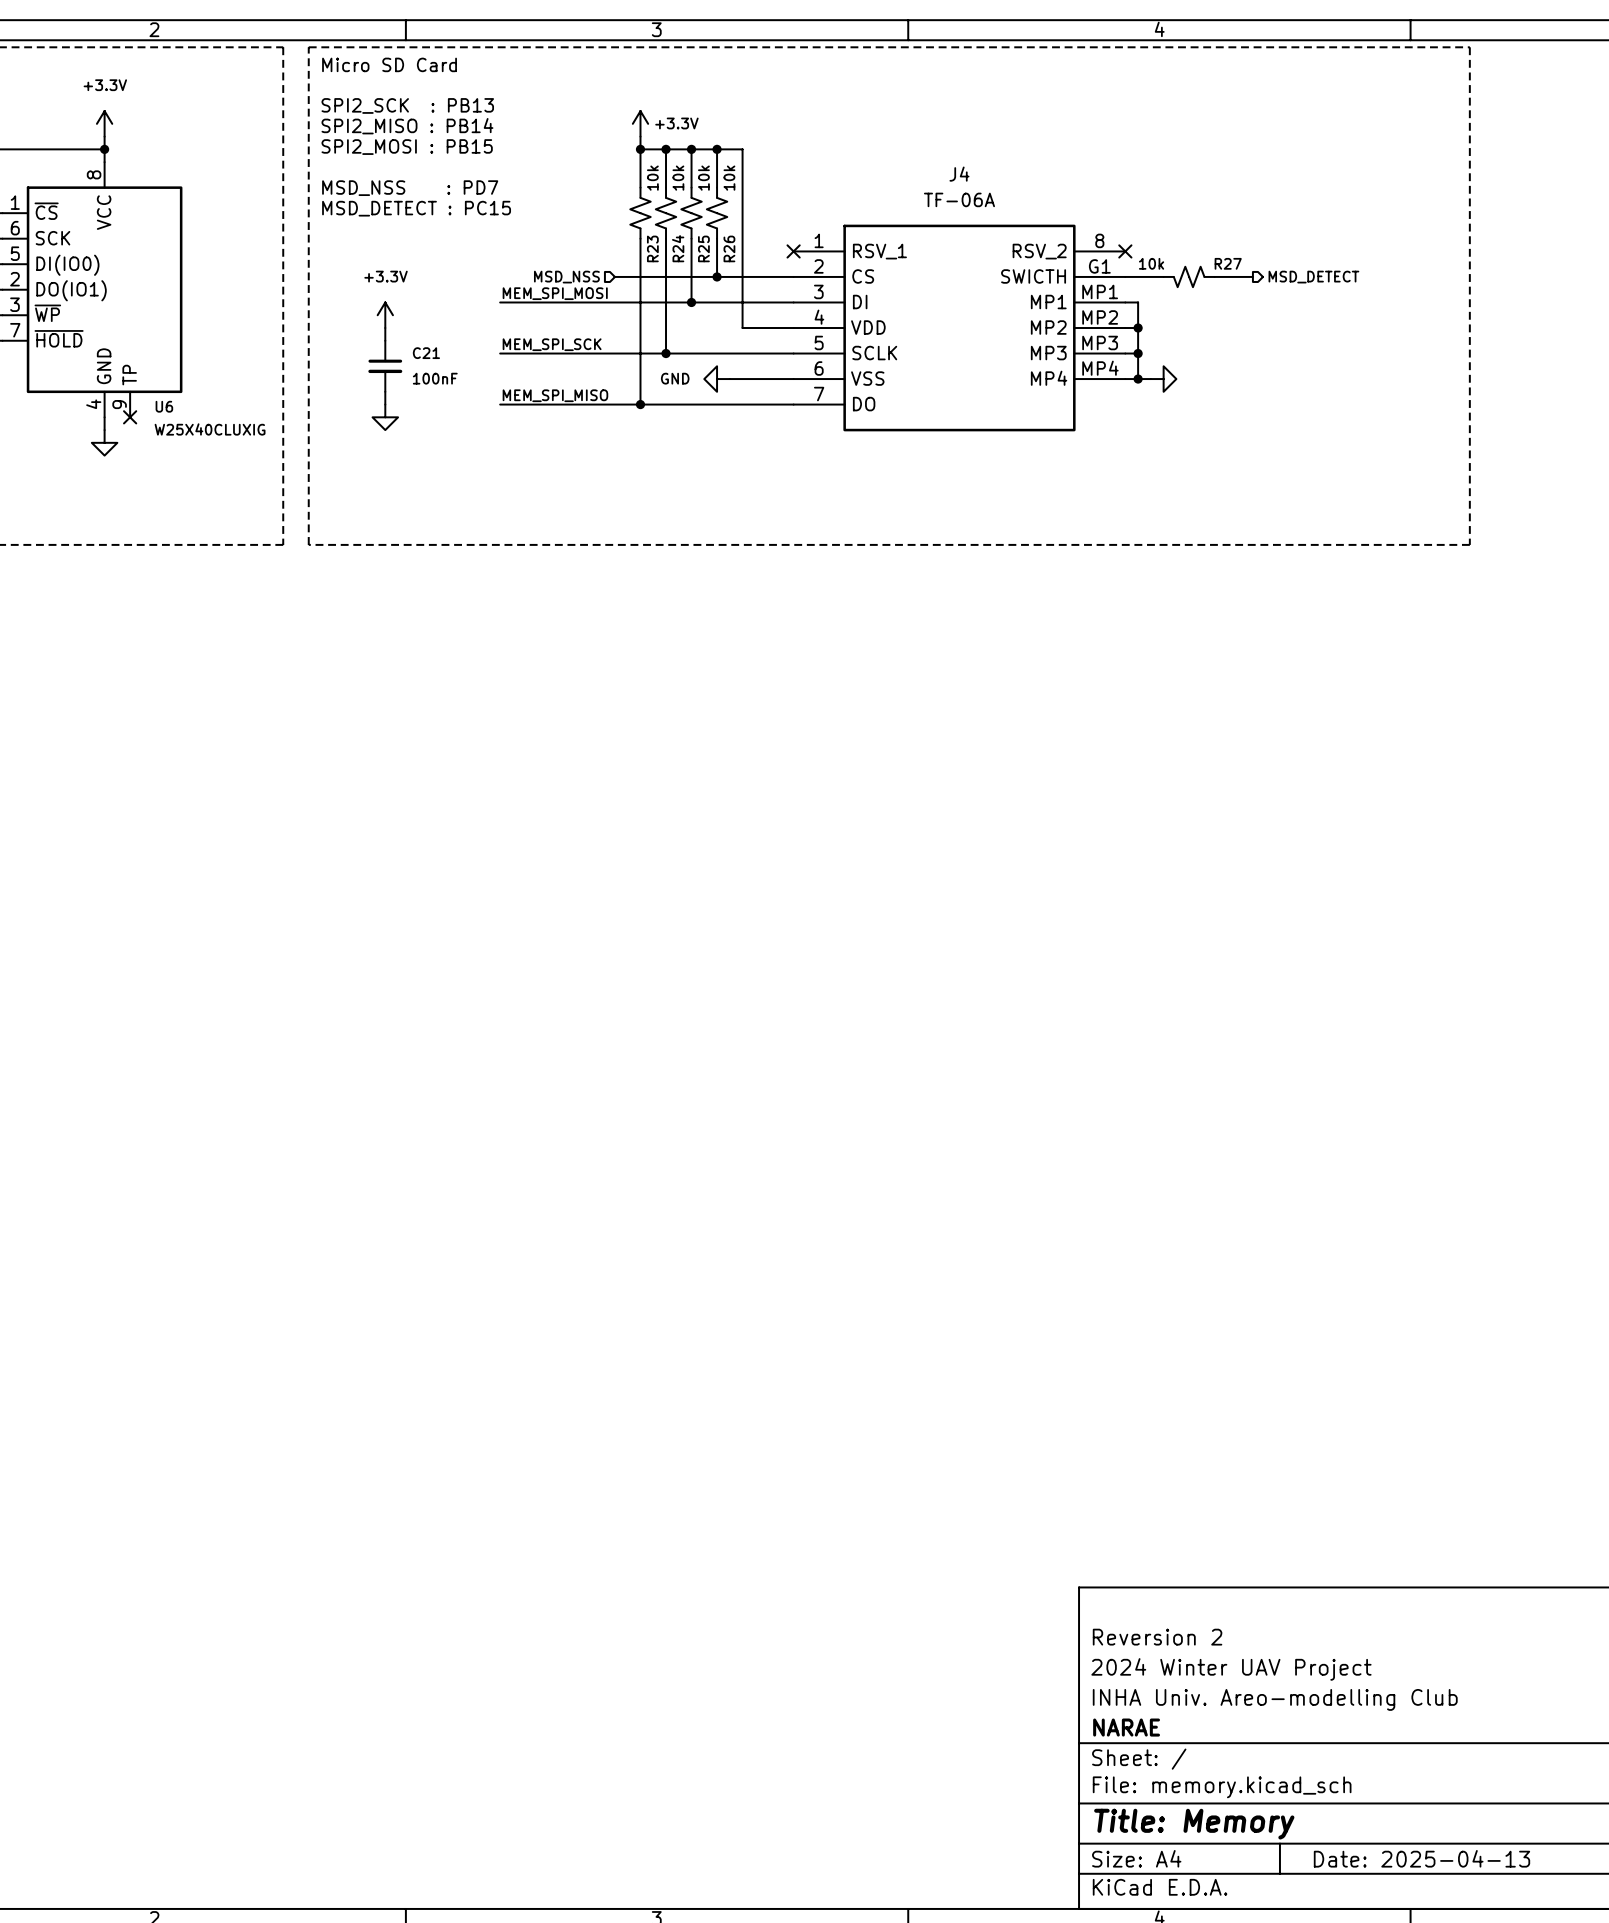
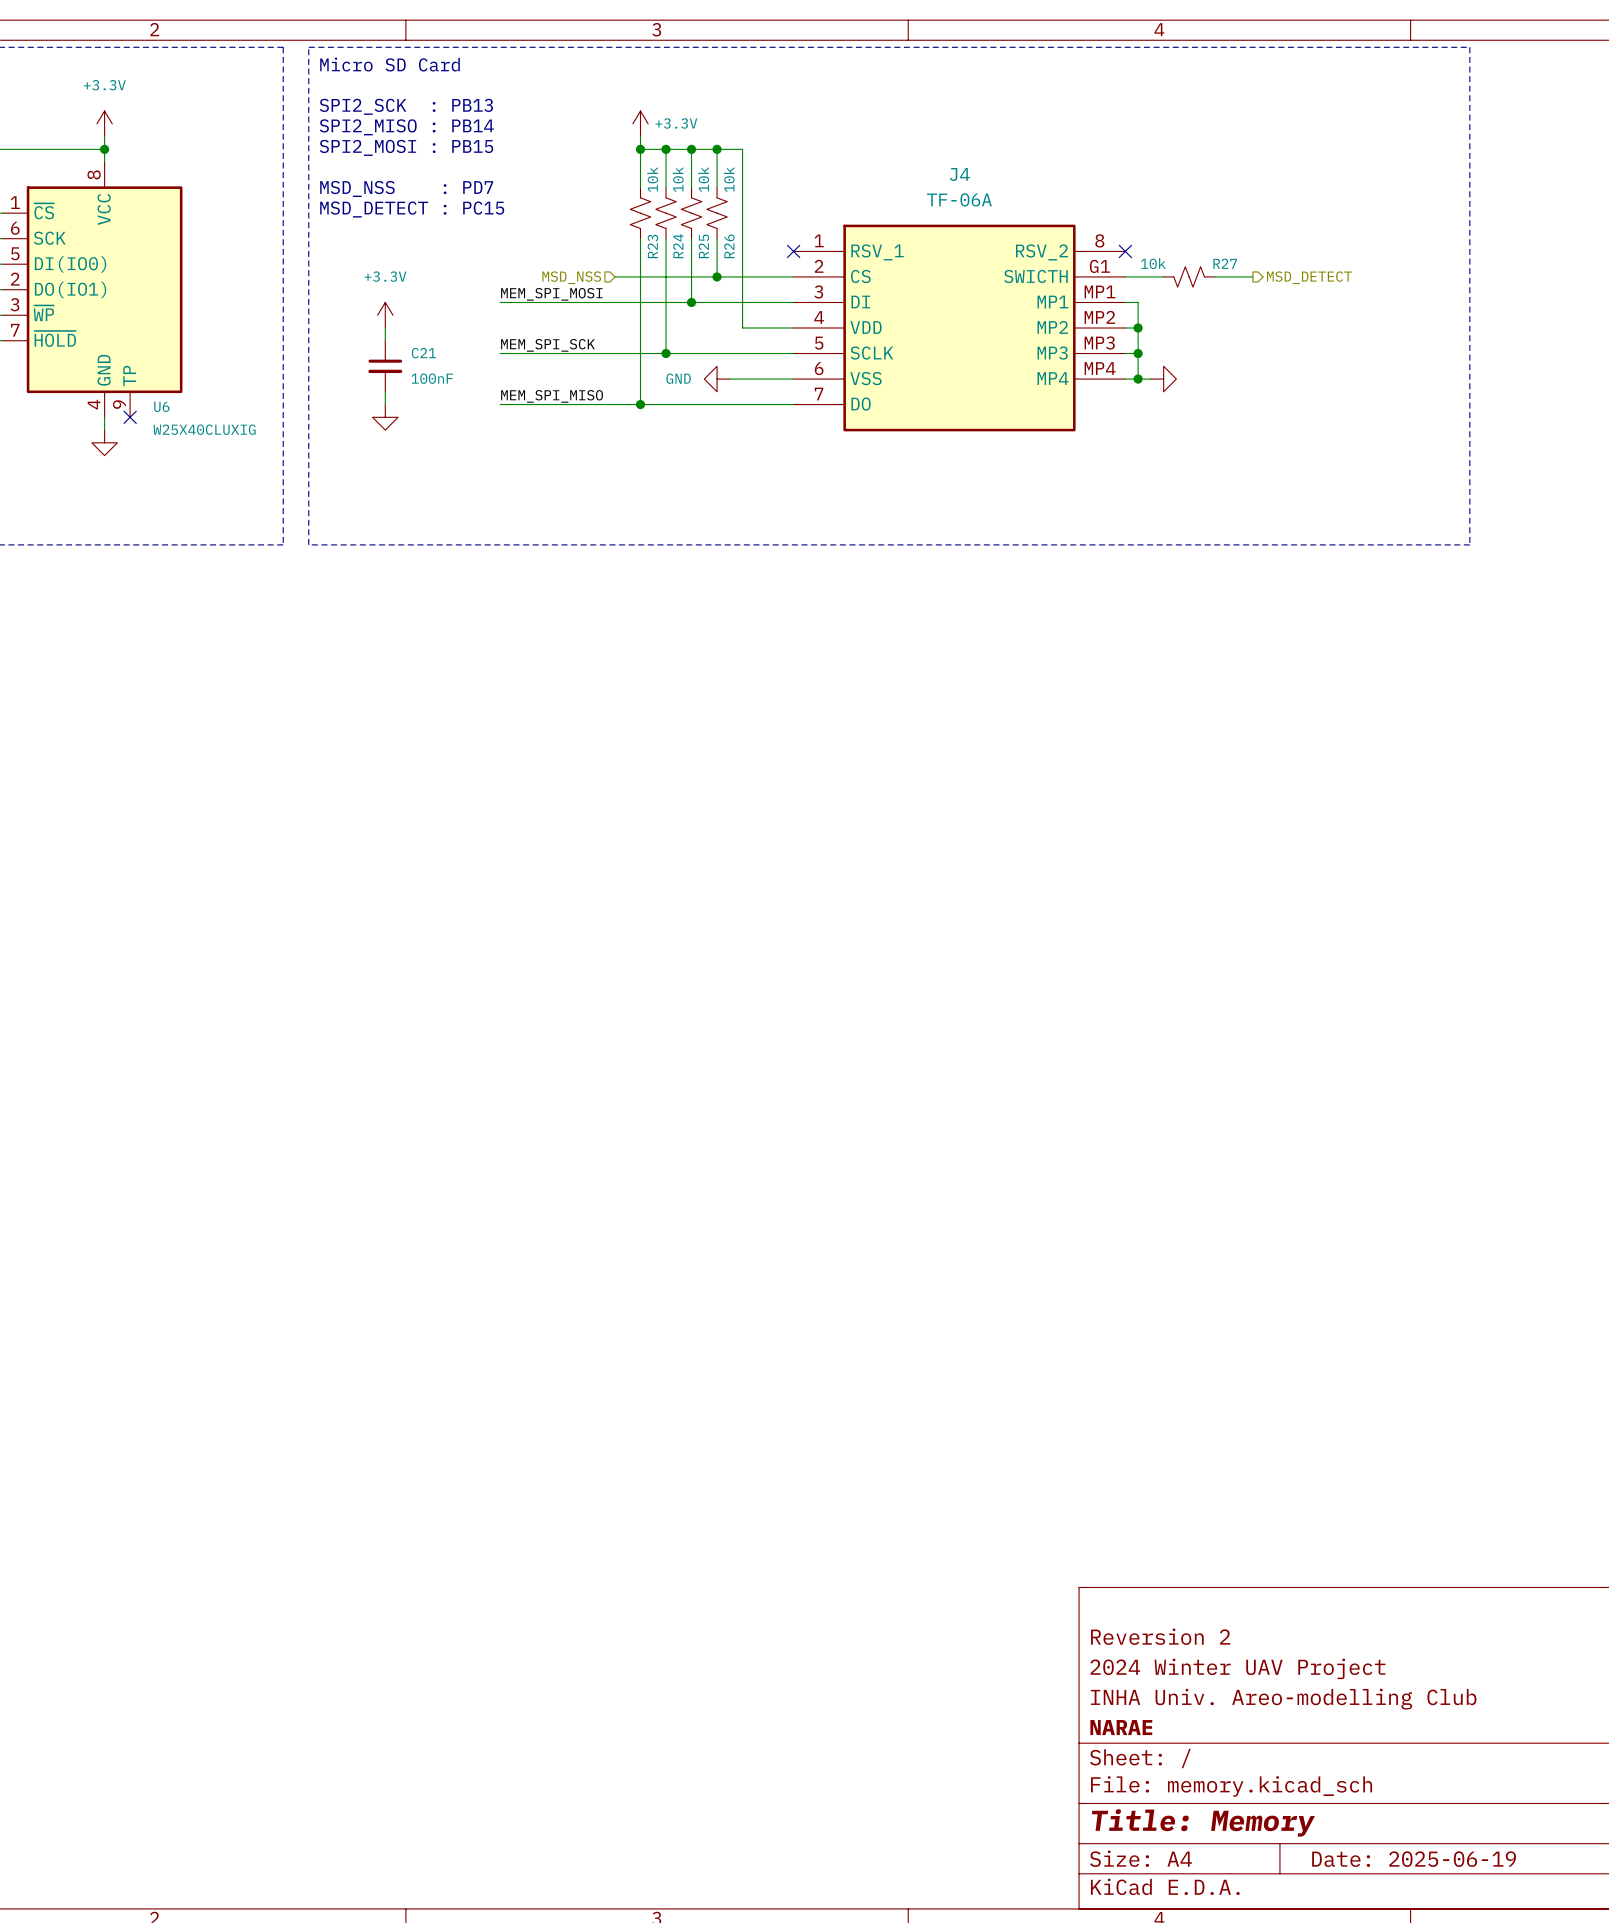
title block: Date: 2025-04-13 (1421, 1858) -> Date: 2025-06-19 (1414, 1859)

